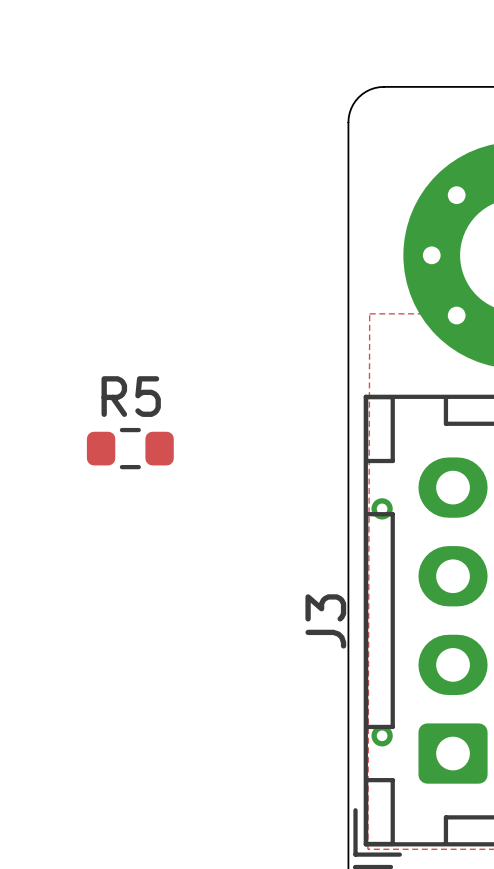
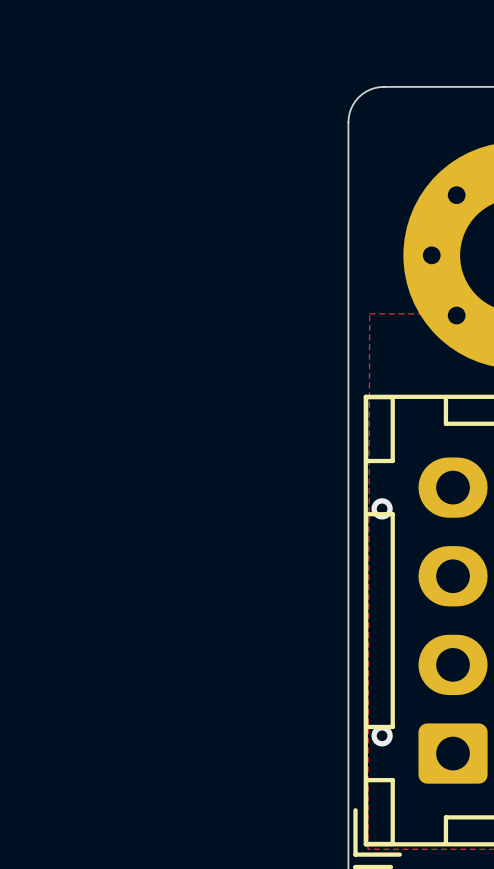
R5: (130, 448) -> none
J3 name: J3 (325, 621) -> none

